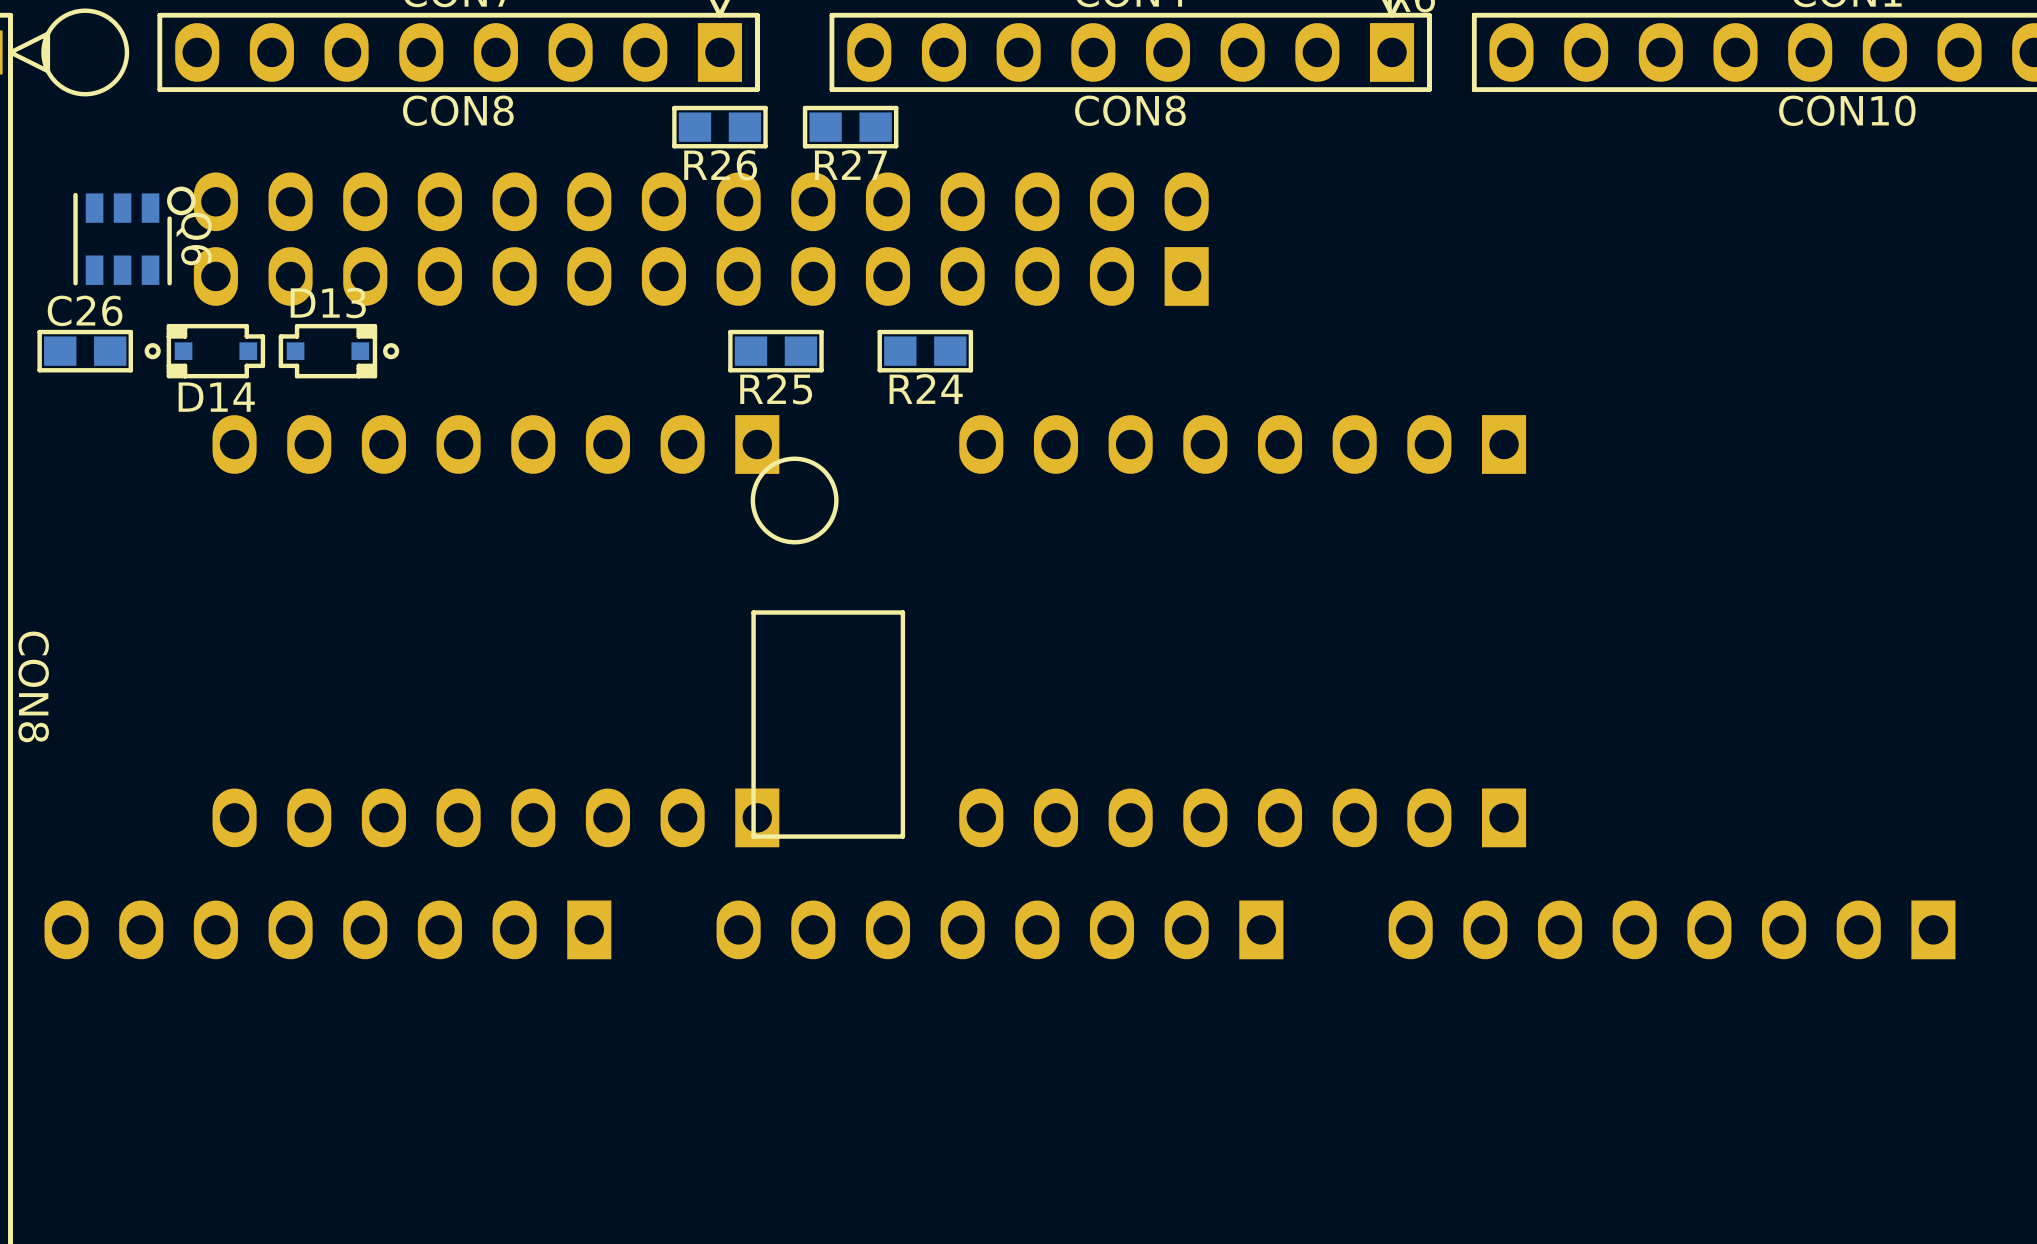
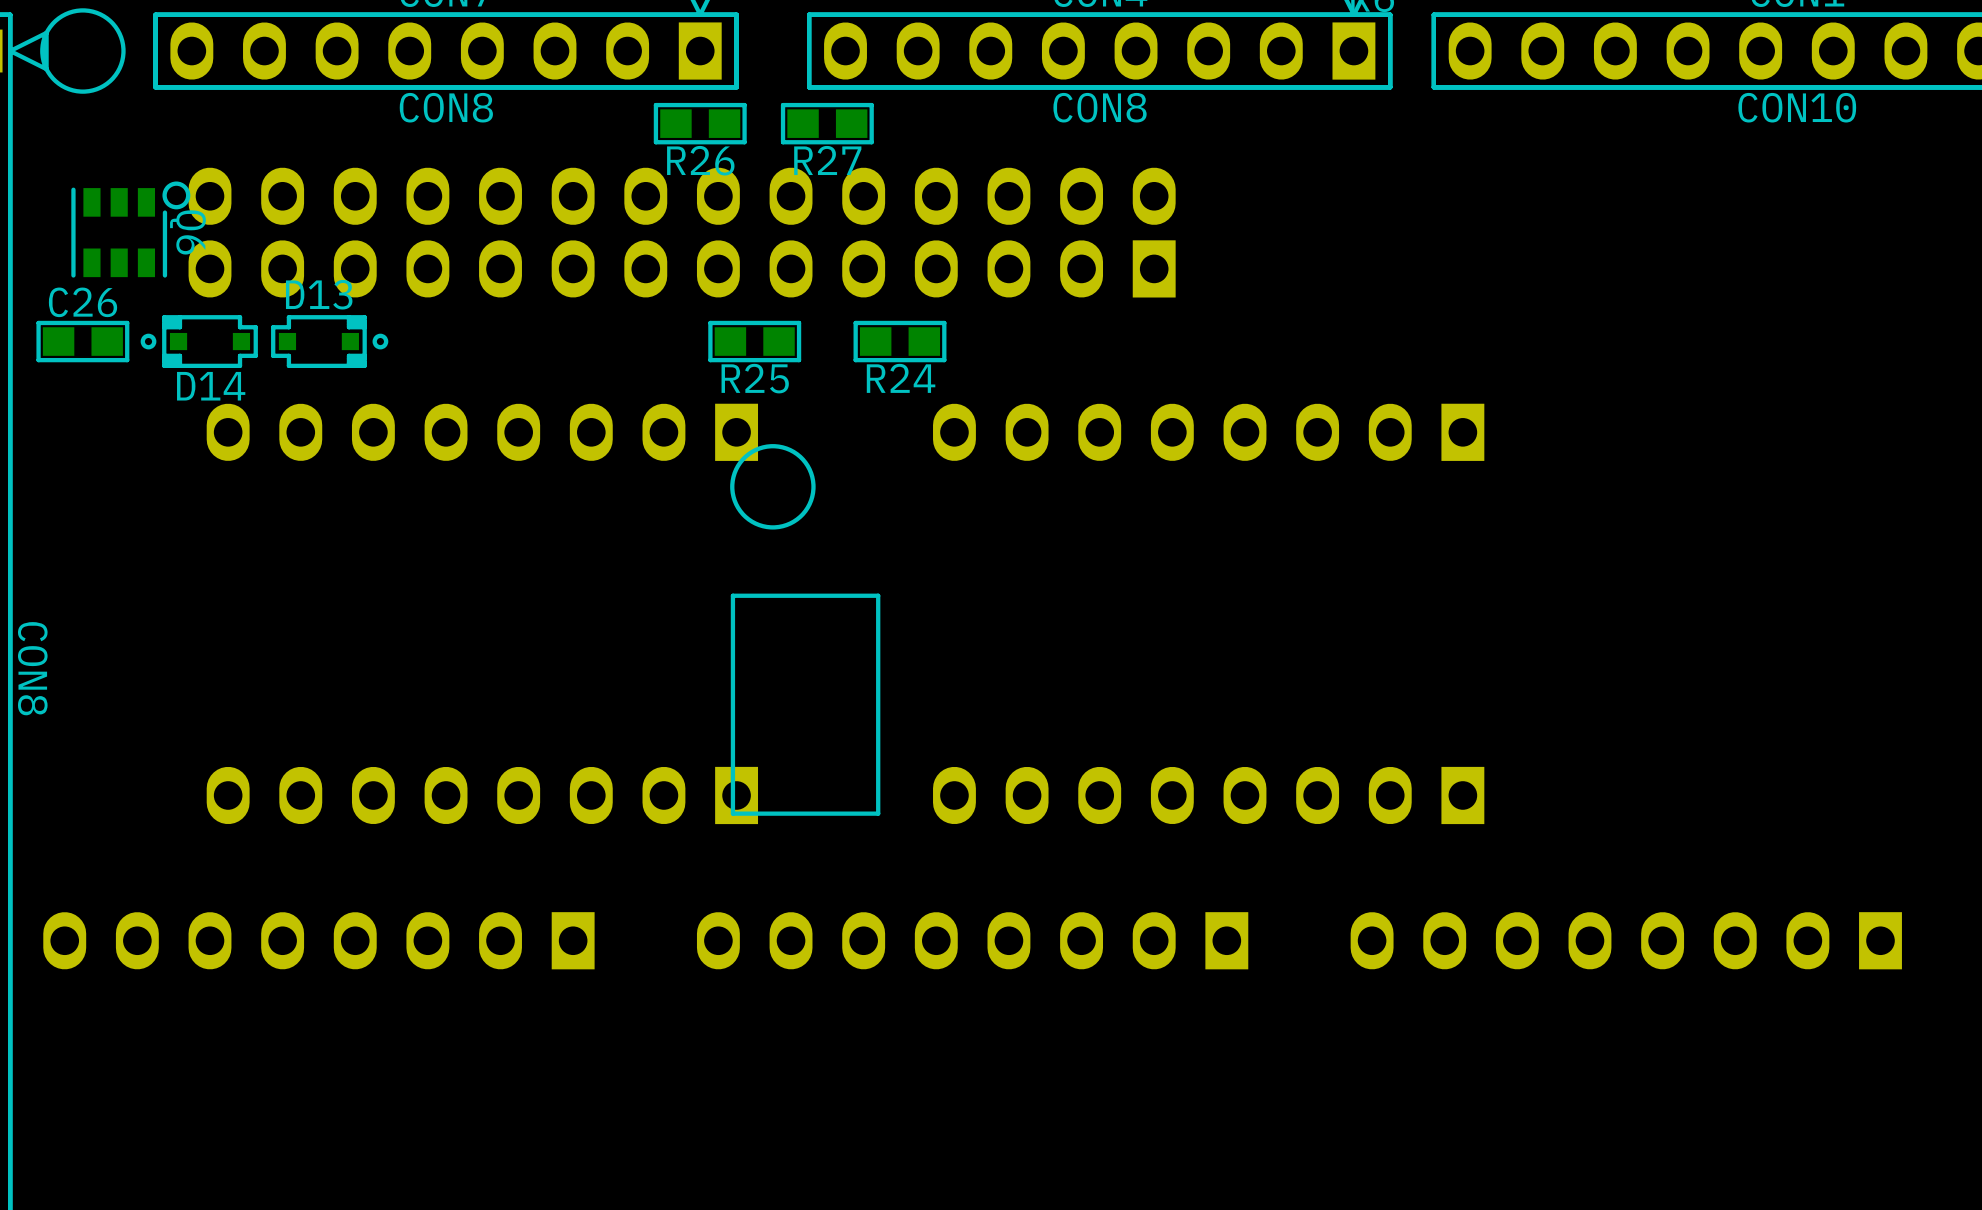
part position: (327, 929) -> (318, 940)
part position: (999, 929) -> (972, 940)
part position: (1672, 929) -> (1626, 940)

